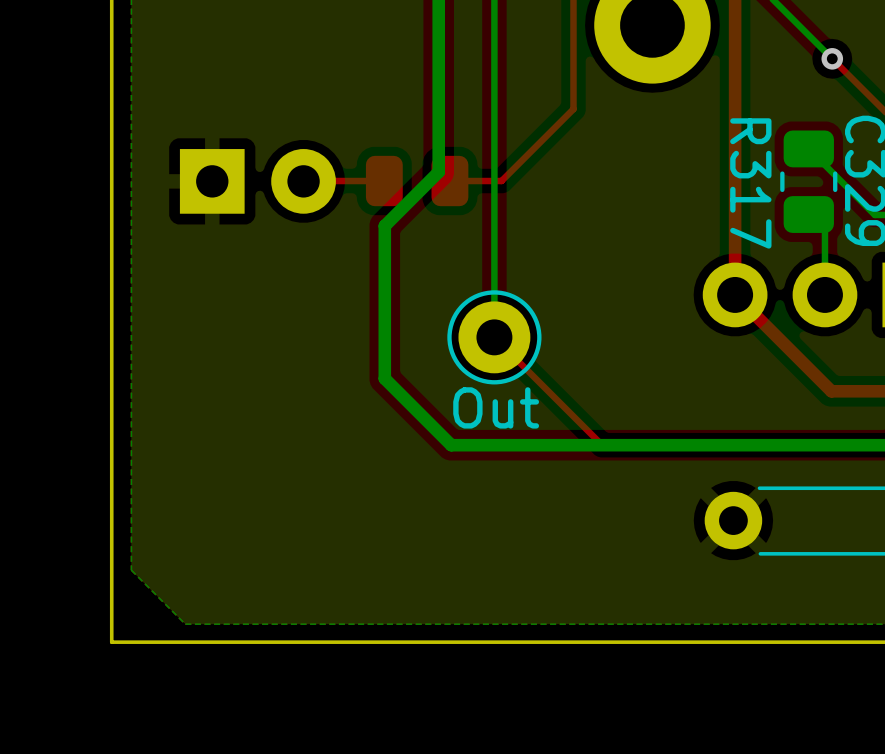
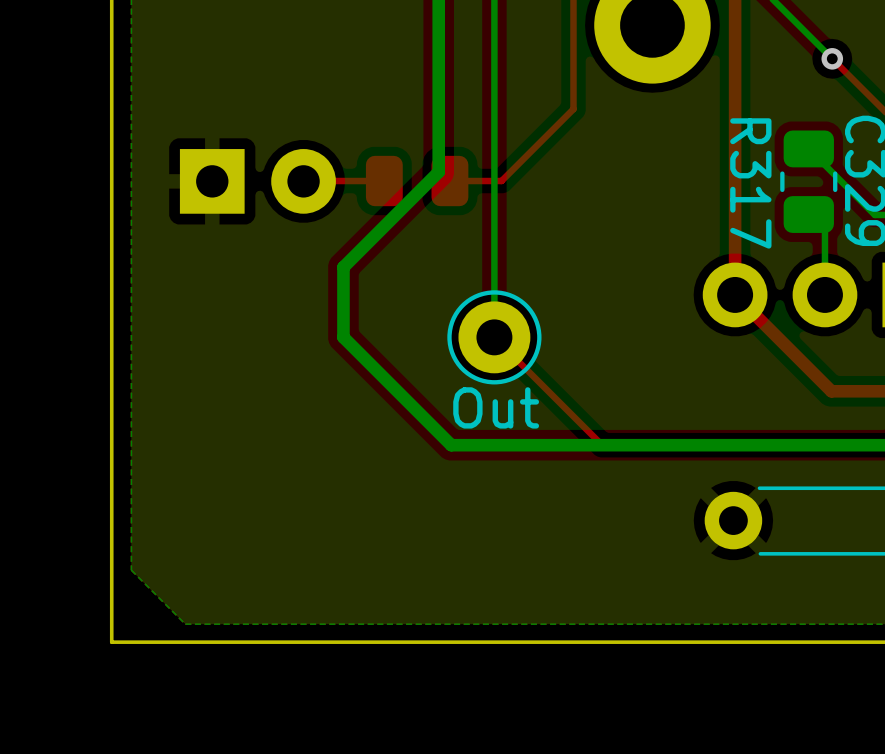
bottom track: (384, 225) (384, 378) -> (384, 225) (343, 267) (343, 337) (384, 378)

